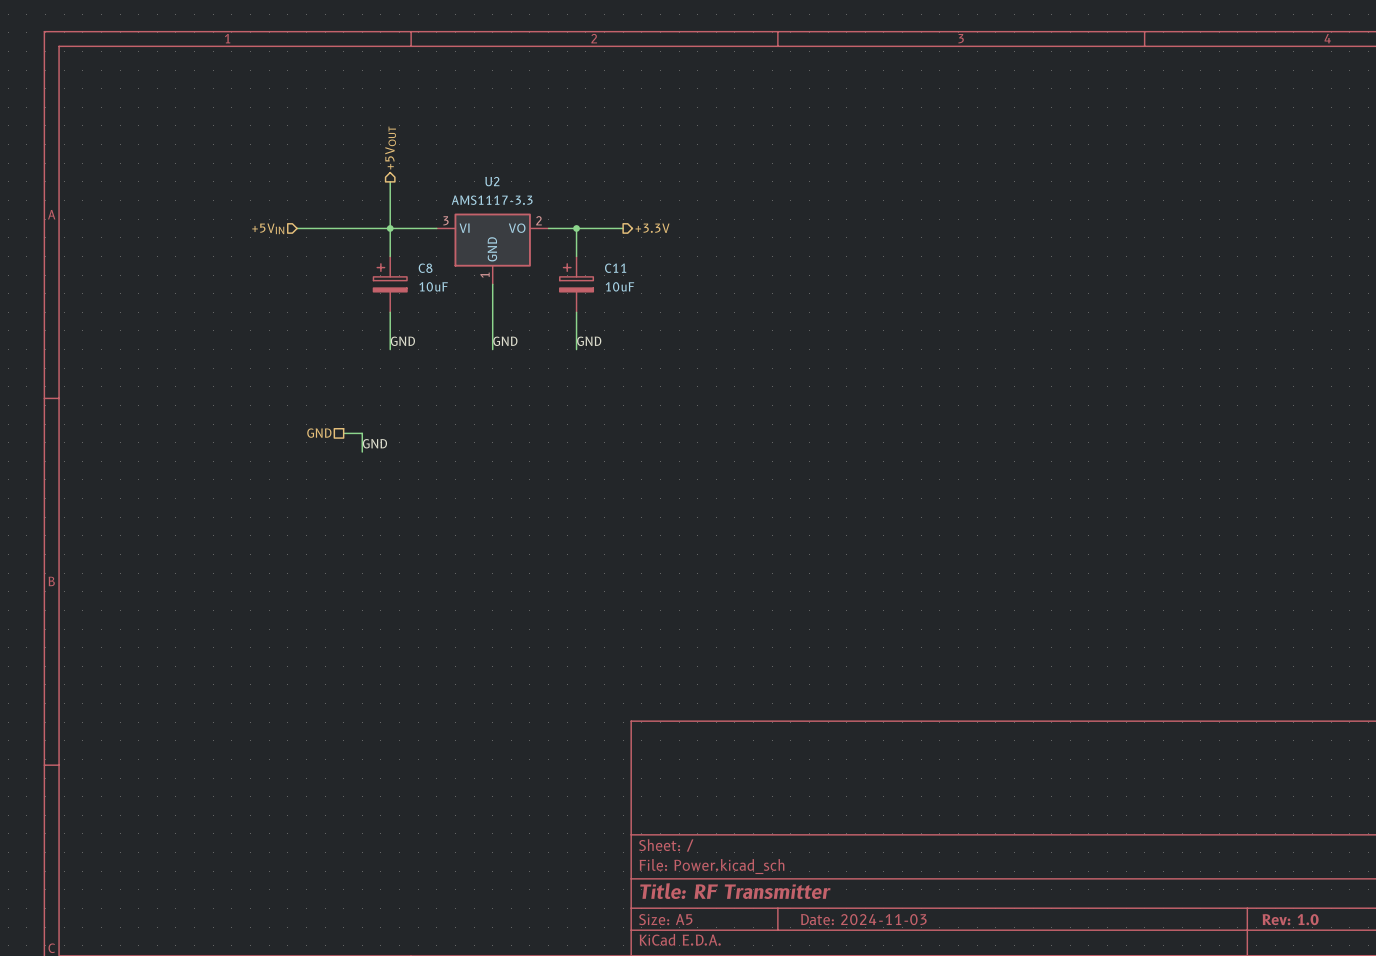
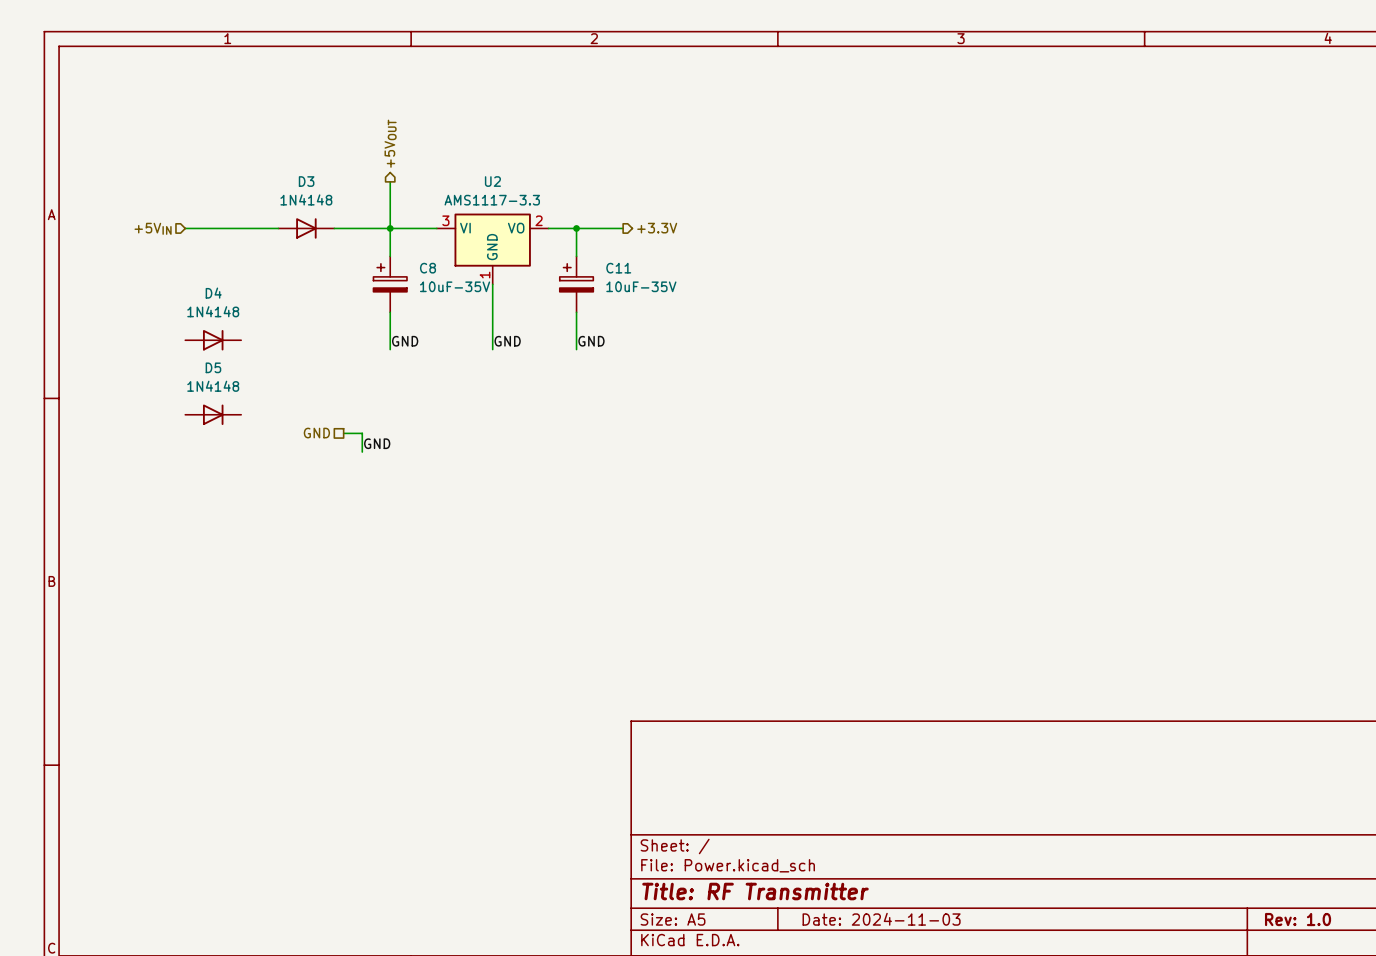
wire: none -> (185, 228) (278, 228)
hierarchical label position: +5VIN (268, 228) -> +5VIN (153, 228)
D3: none -> 1N4148 (306, 228)
C8 value: 10uF (433, 286) -> 10uF-35V (455, 286)
C11 value: 10uF (619, 286) -> 10uF-35V (641, 286)
D4: none -> 1N4148 (213, 340)
D5: none -> 1N4148 (213, 414)

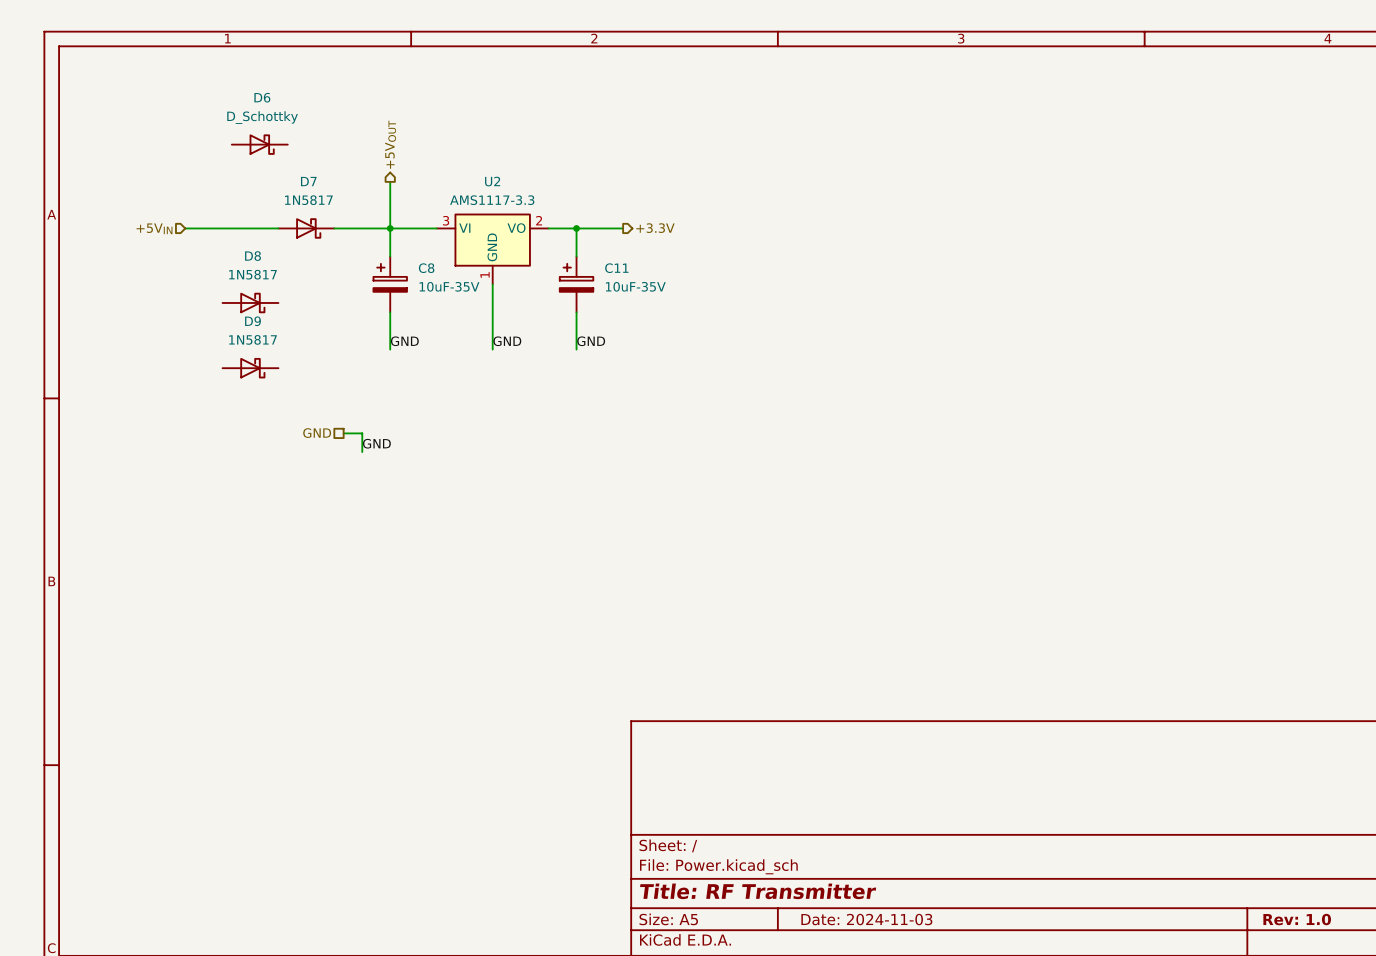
D6: none -> D_Schottky (259, 144)
D3: 1N4148 (306, 228) -> none
D7: none -> 1N5817 (306, 228)
D8: none -> 1N5817 (250, 302)
D4: 1N4148 (213, 340) -> none
D9: none -> 1N5817 (250, 368)
D5: 1N4148 (213, 414) -> none

